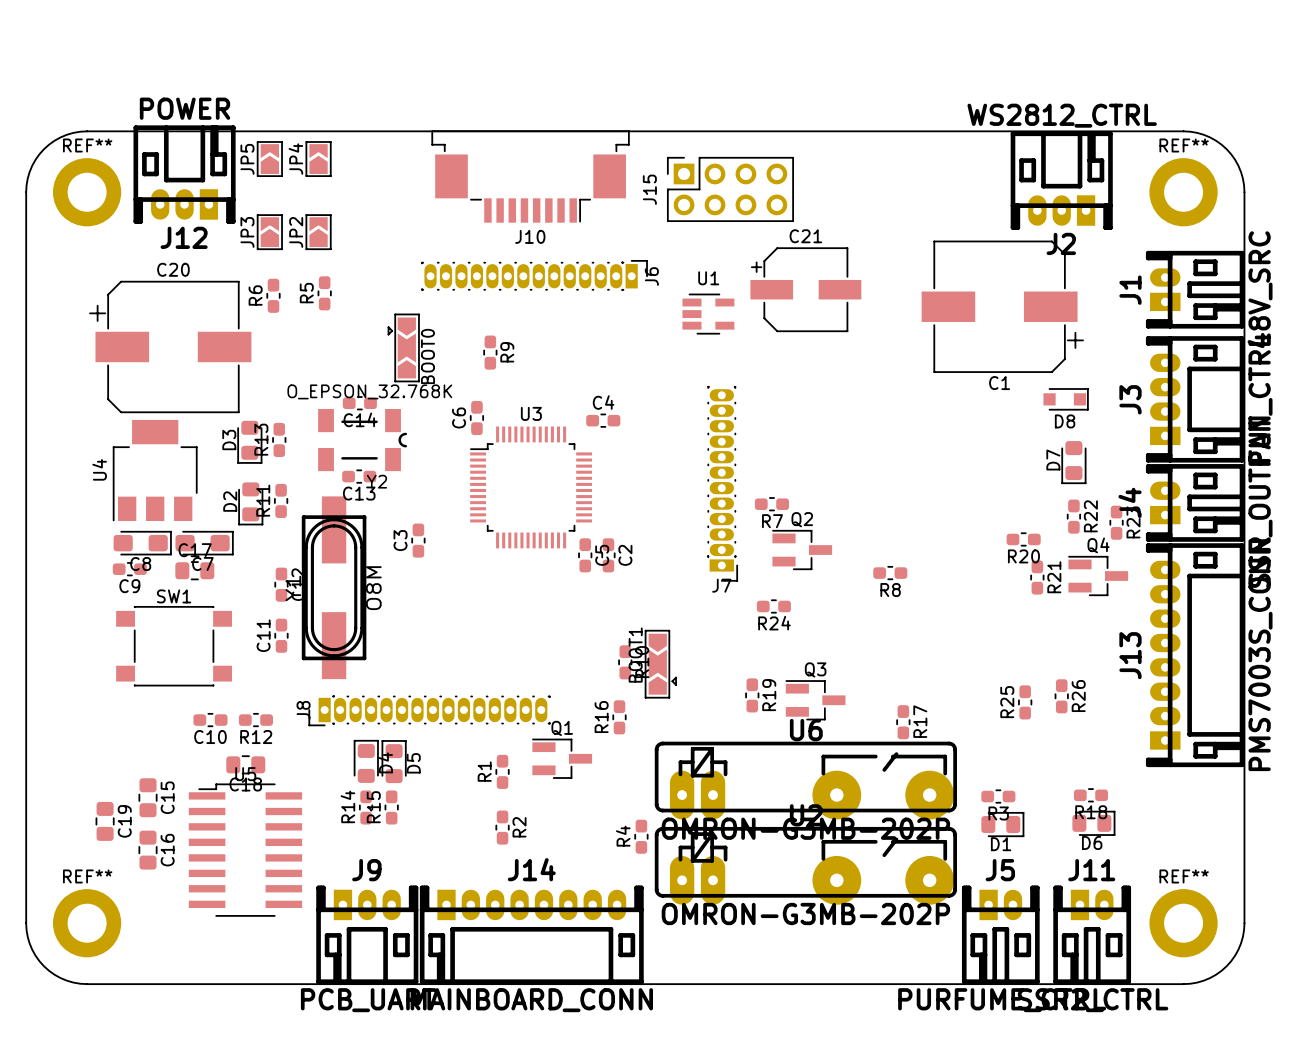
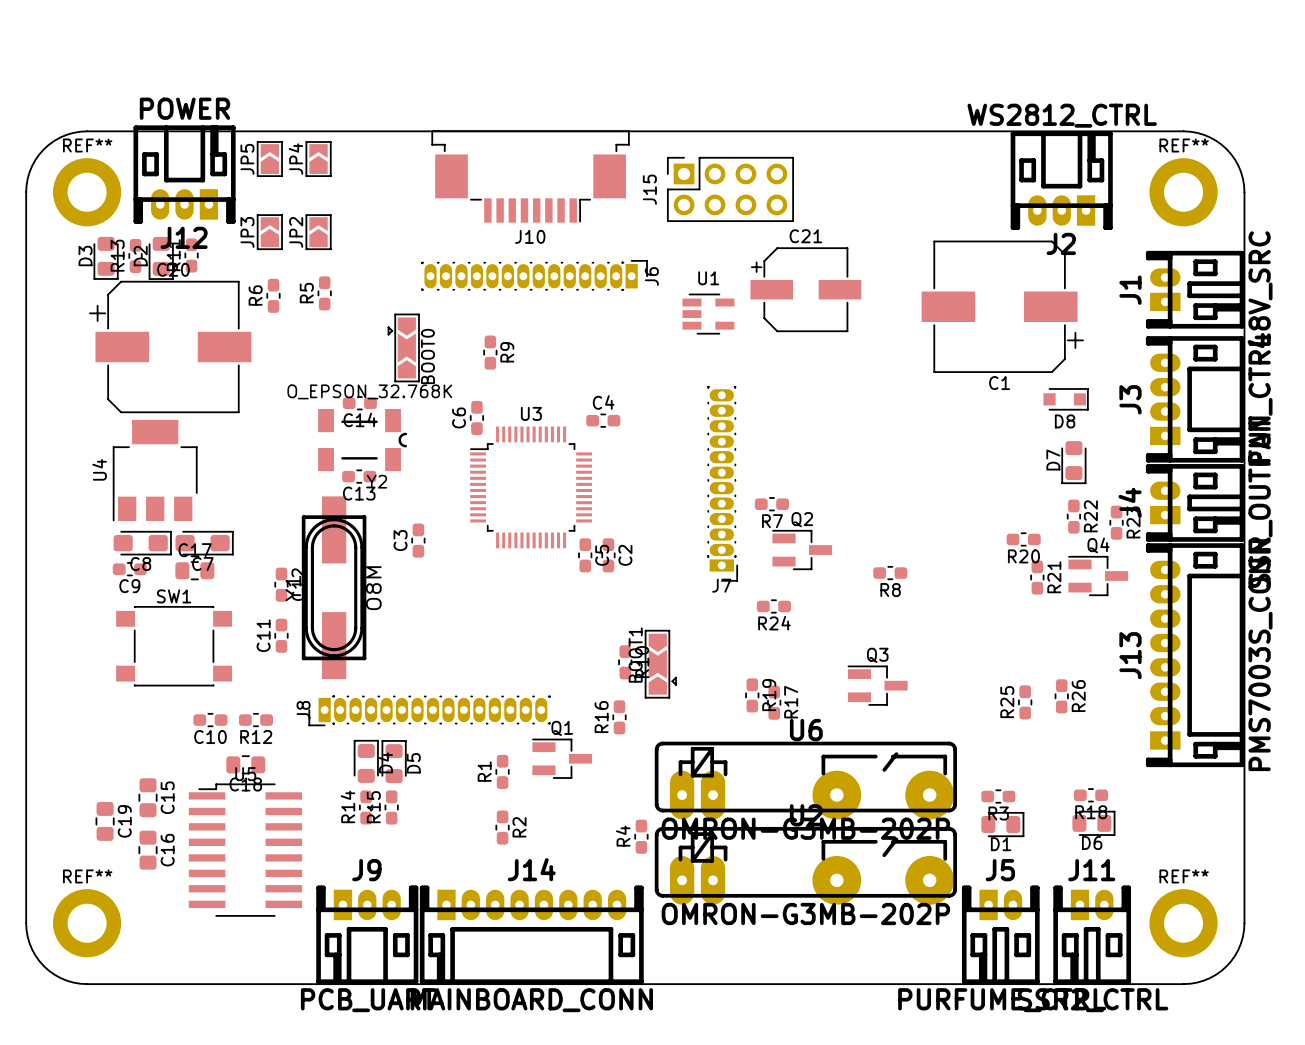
R13 position: (279, 439) -> (135, 255)
D3 position: (249, 442) -> (106, 258)
R11 position: (281, 500) -> (191, 255)
D2 position: (250, 503) -> (161, 258)
Q3 position: (815, 700) -> (877, 685)
R17 position: (903, 722) -> (774, 702)

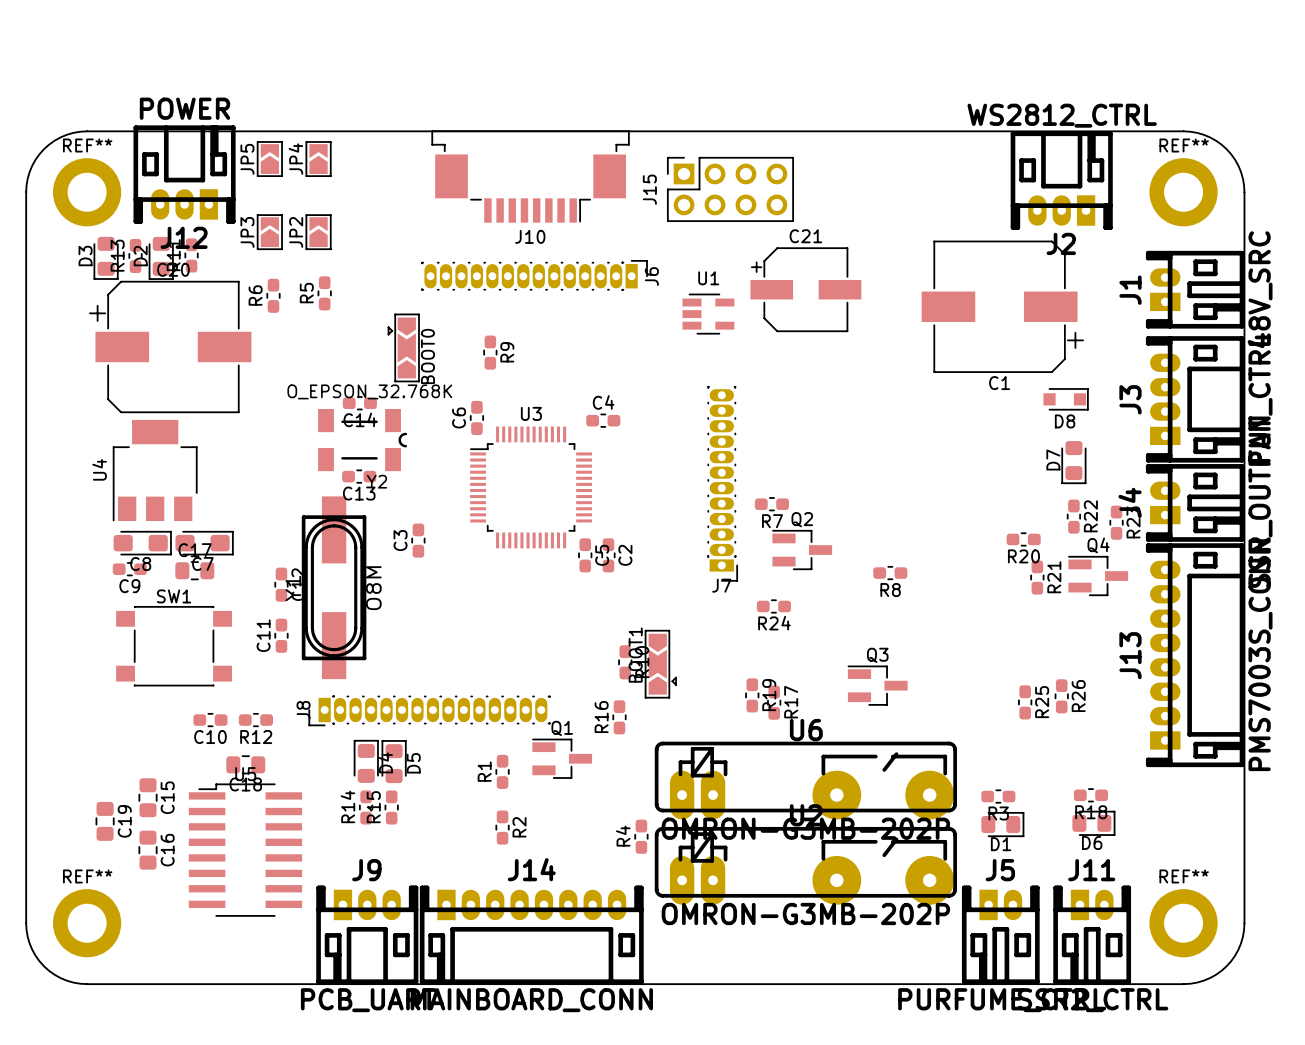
R25 name position: R25 (1007, 702) -> R25 (1042, 702)

